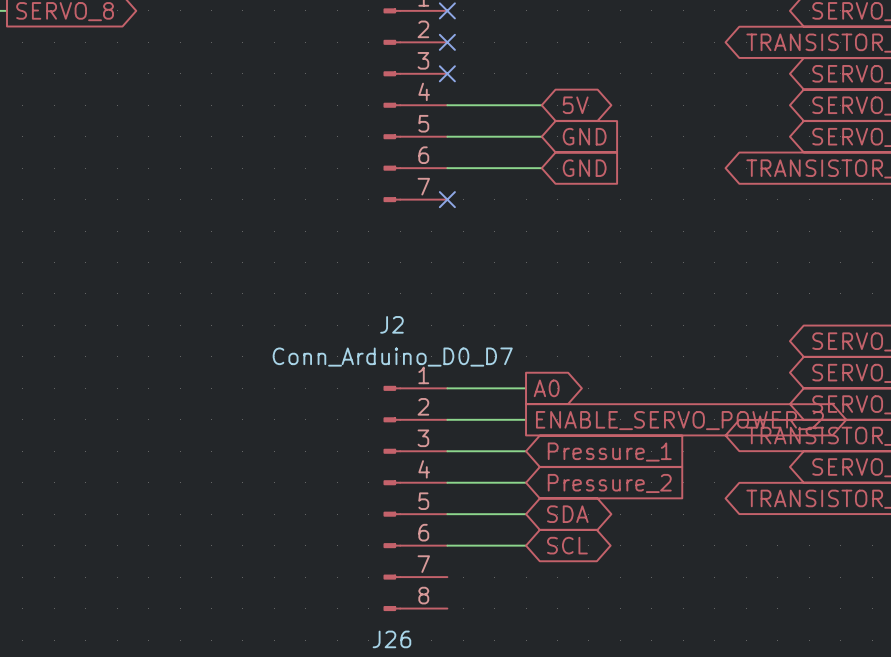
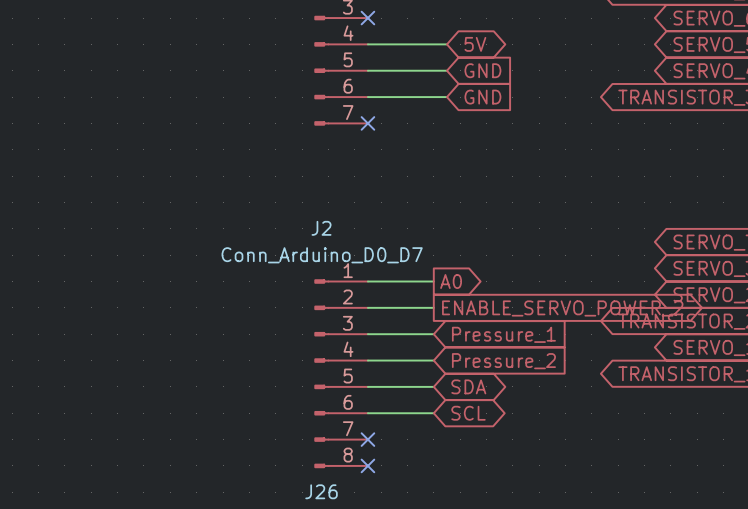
no-connect mark: none -> (367, 439)
no-connect mark: none -> (367, 465)

